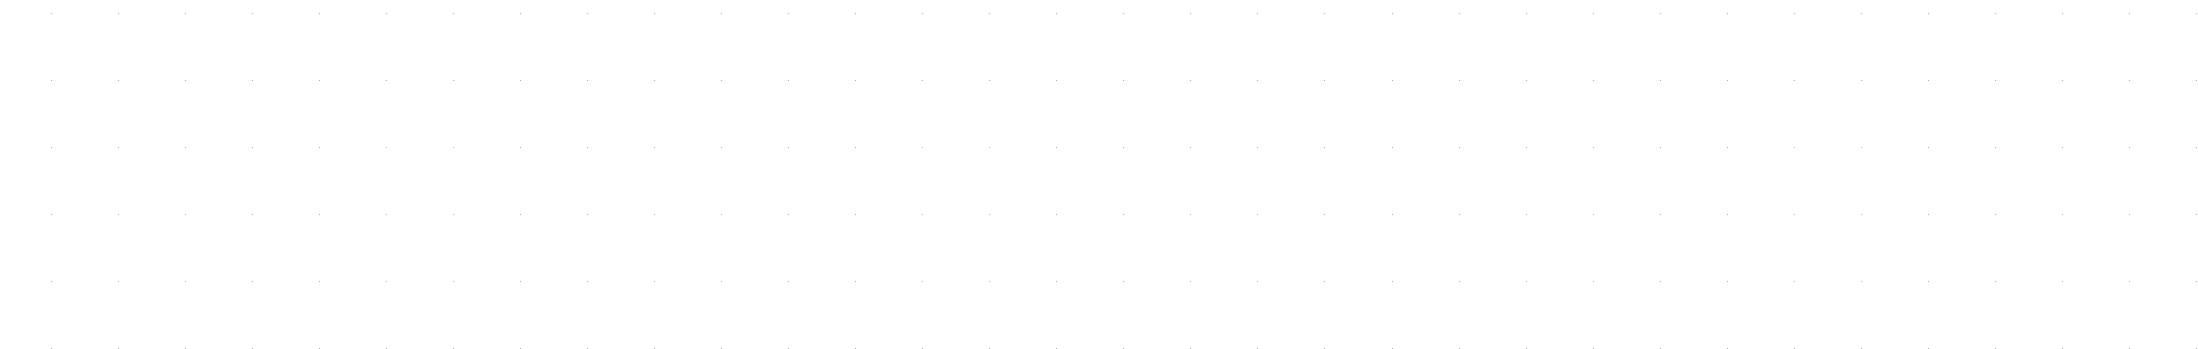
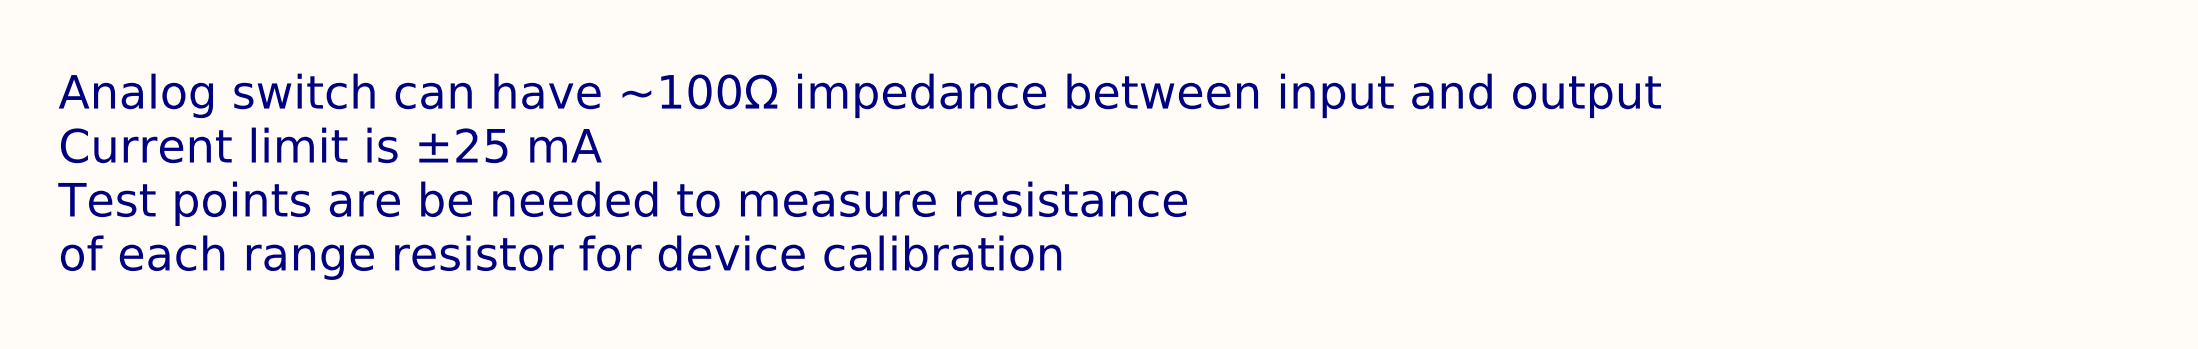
text: none -> Analog switch can have ~100Ω impedance between input and output (859, 95)
text: none -> Current limit is ±25 mA (331, 145)
text: none -> Test points are be needed to measure resistance (622, 203)
text: none -> of each range resistor for device calibration (561, 257)

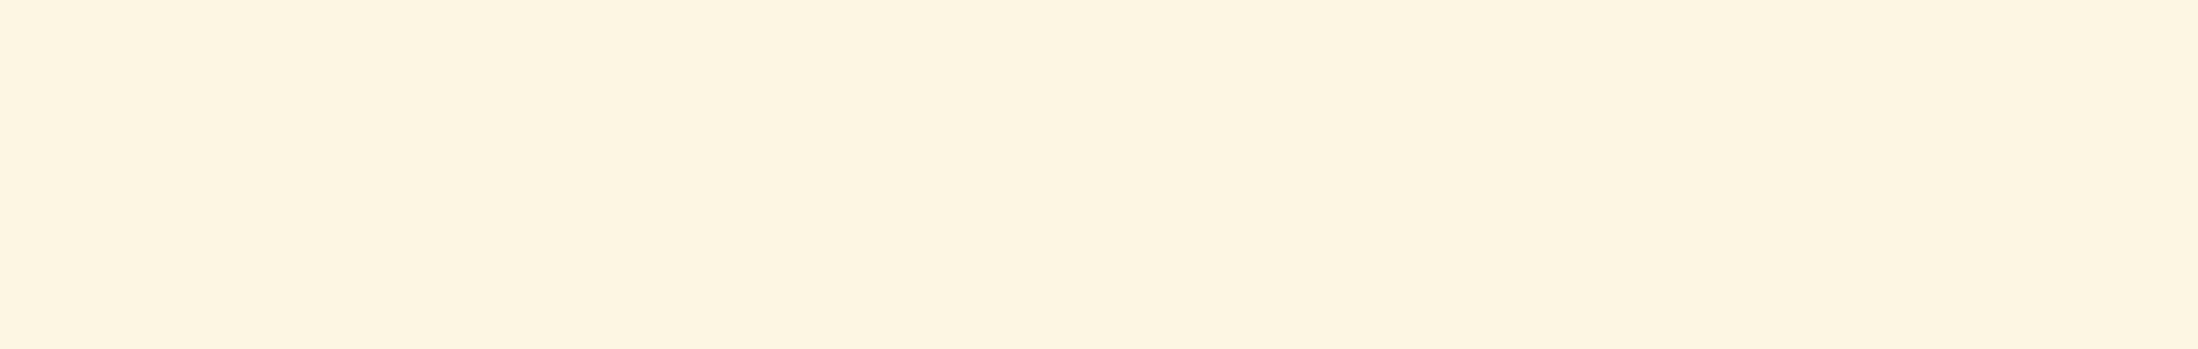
text: Analog switch can have ~100Ω impedance between input and output (859, 95) -> none
text: Current limit is ±25 mA (331, 145) -> none
text: Test points are be needed to measure resistance (622, 203) -> none
text: of each range resistor for device calibration (561, 257) -> none

